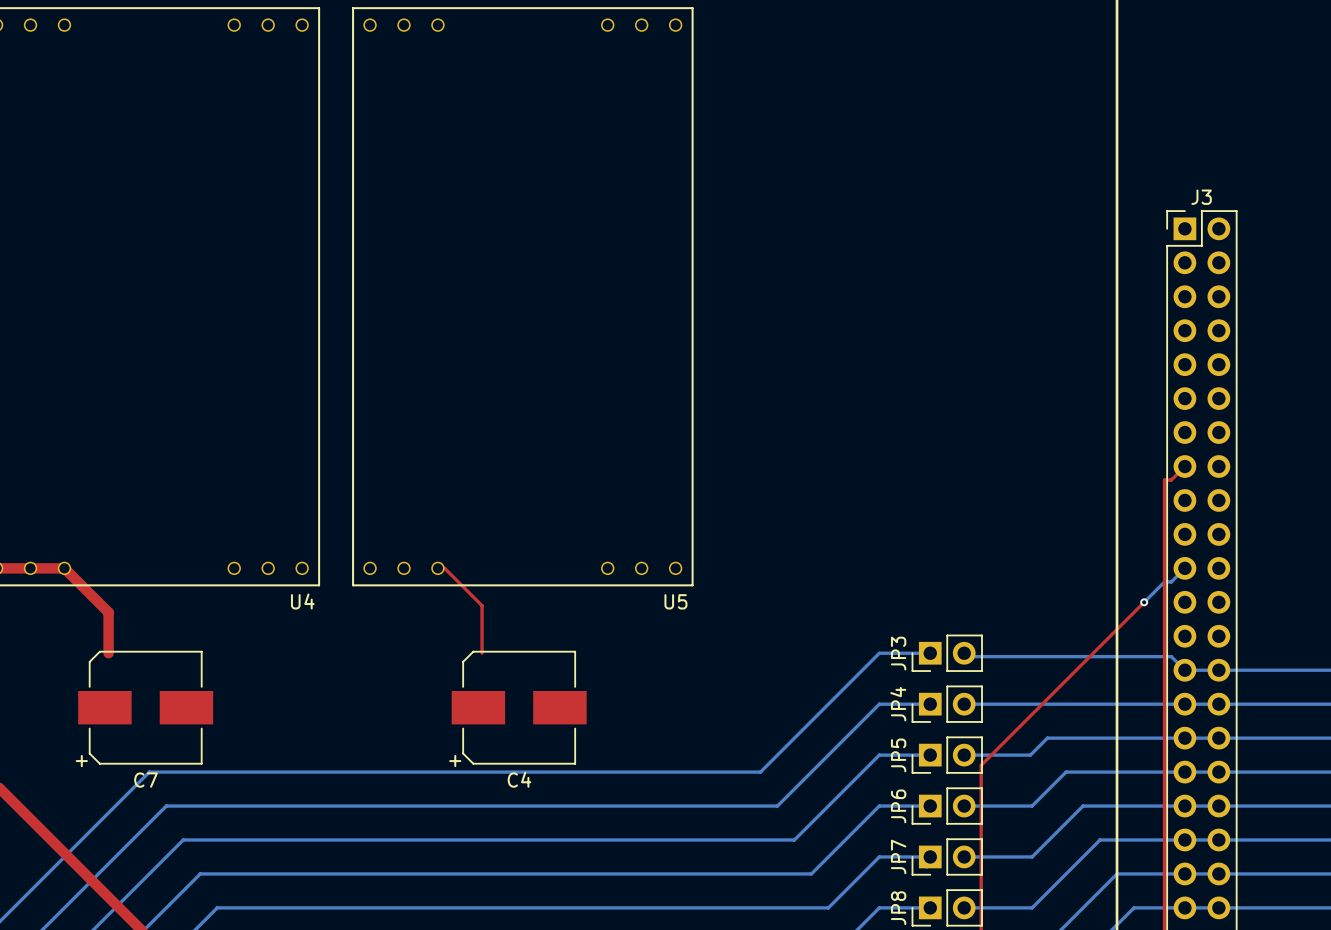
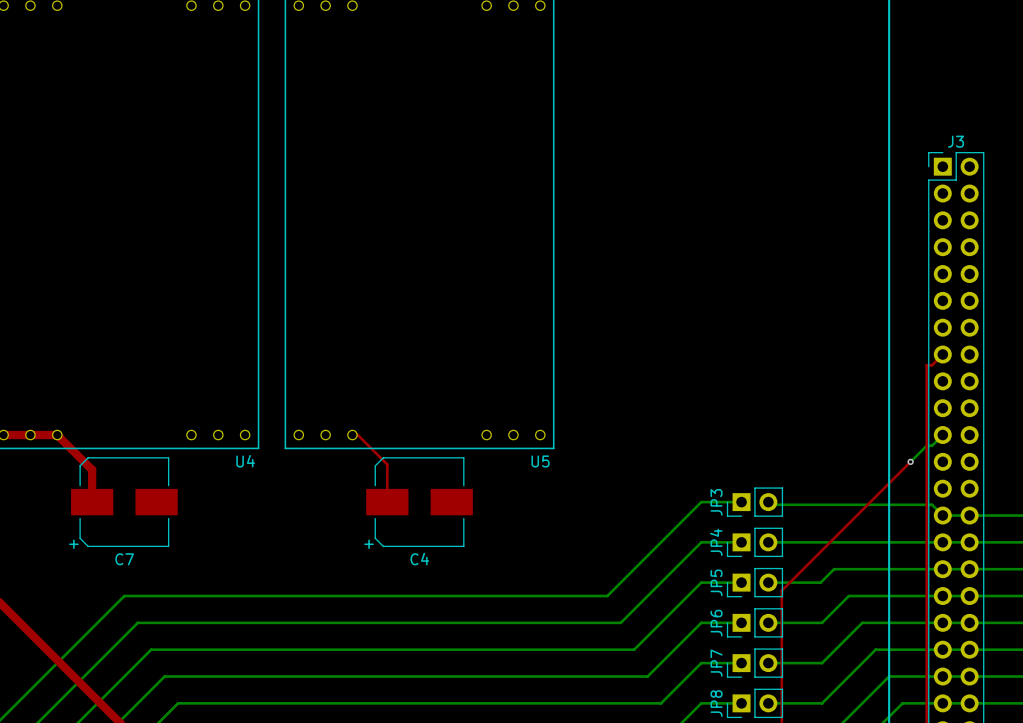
C7 position: (145, 707) -> (124, 502)
C4 position: (519, 707) -> (419, 502)

